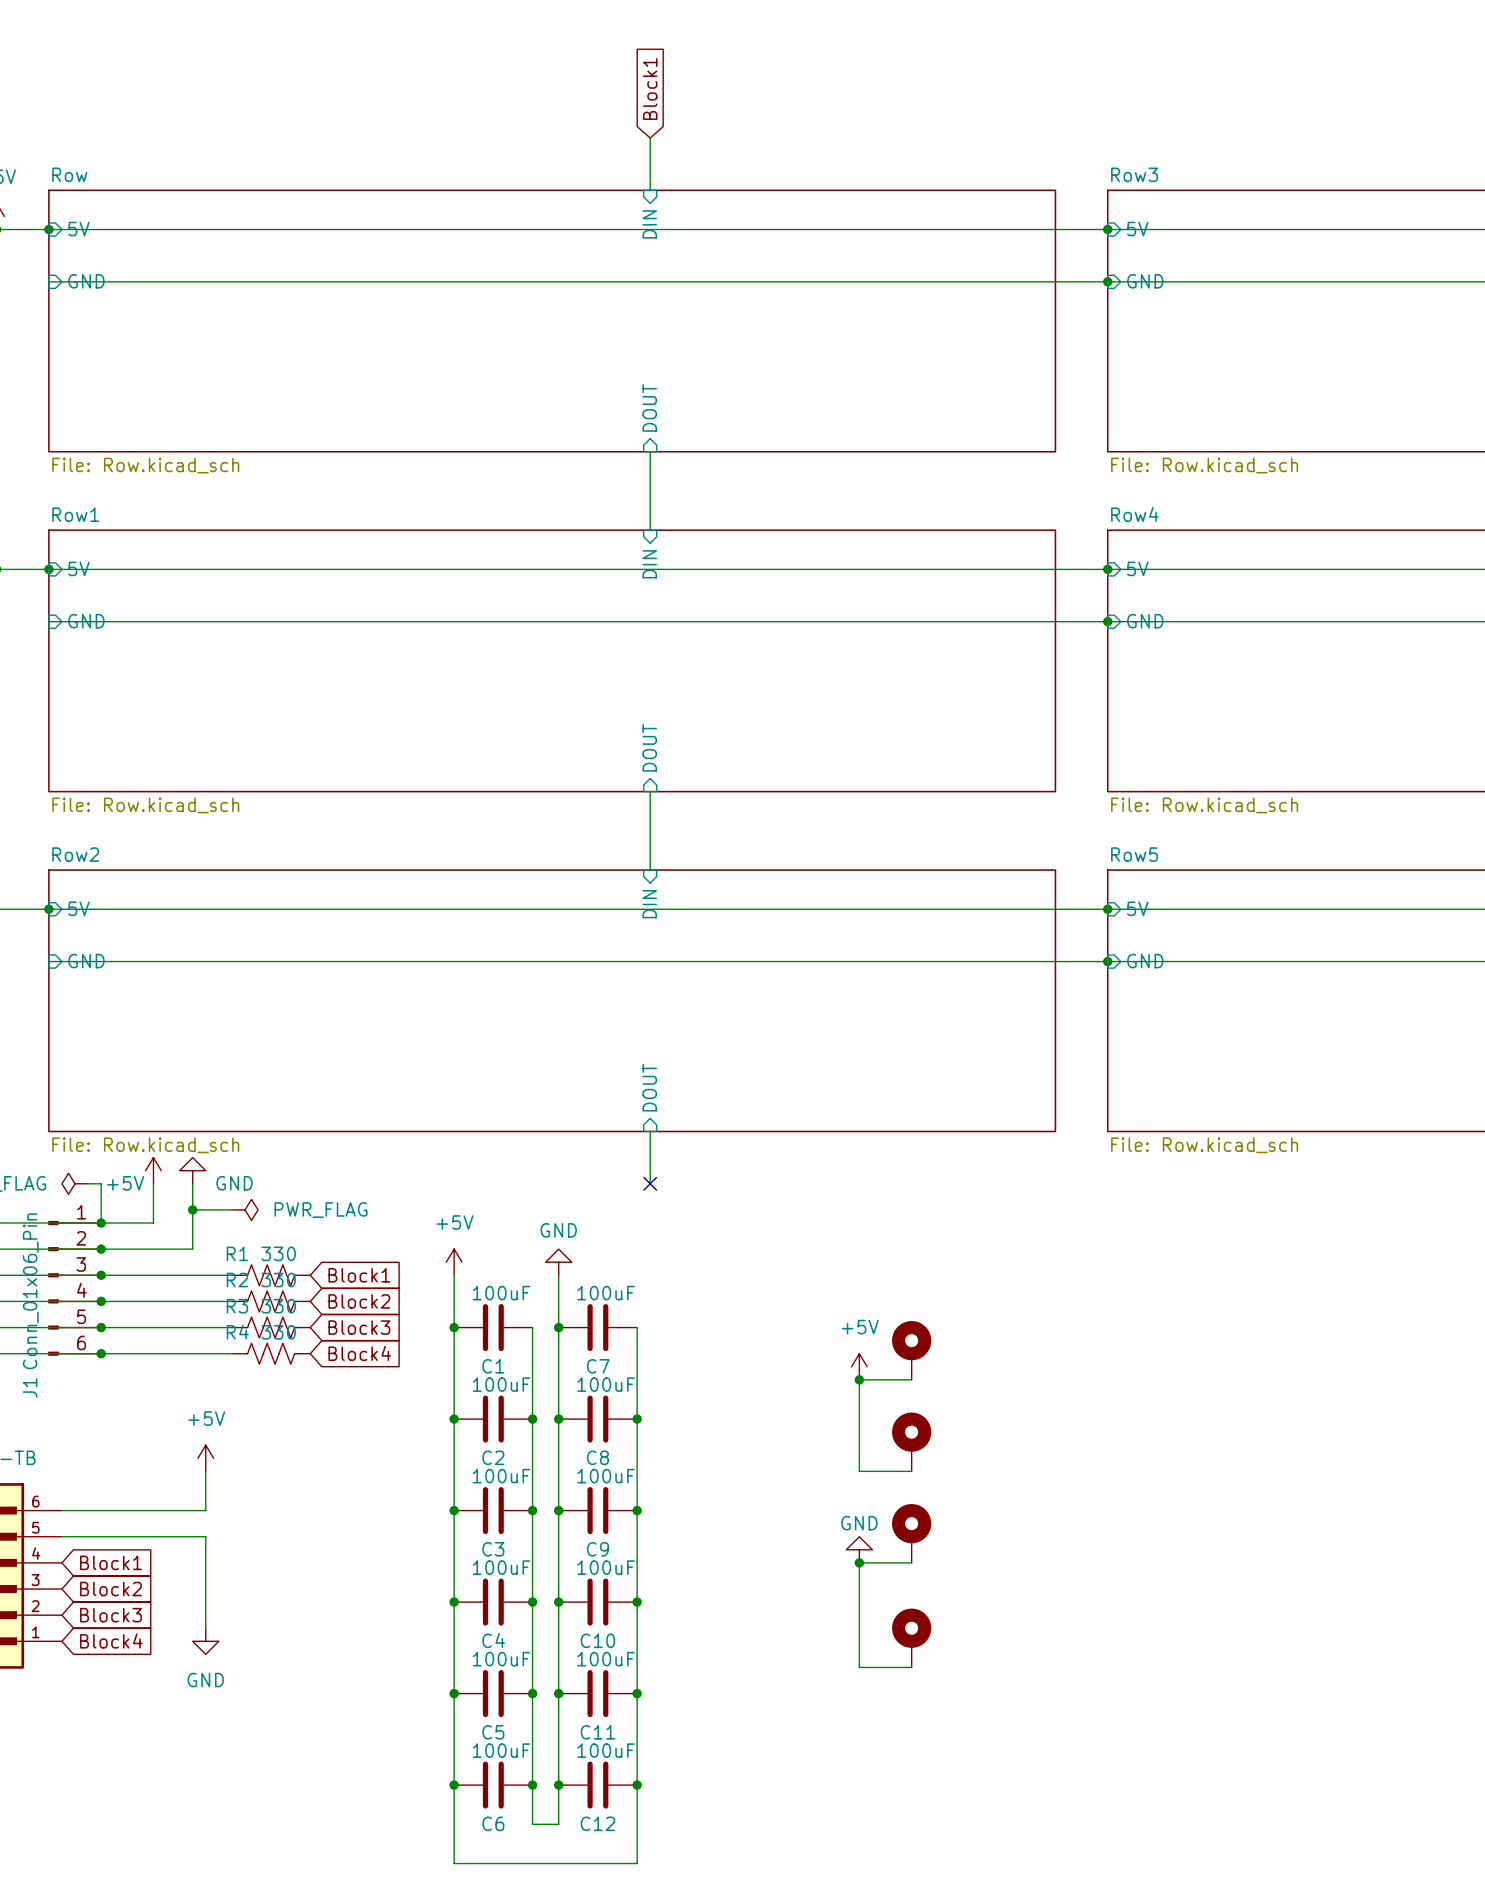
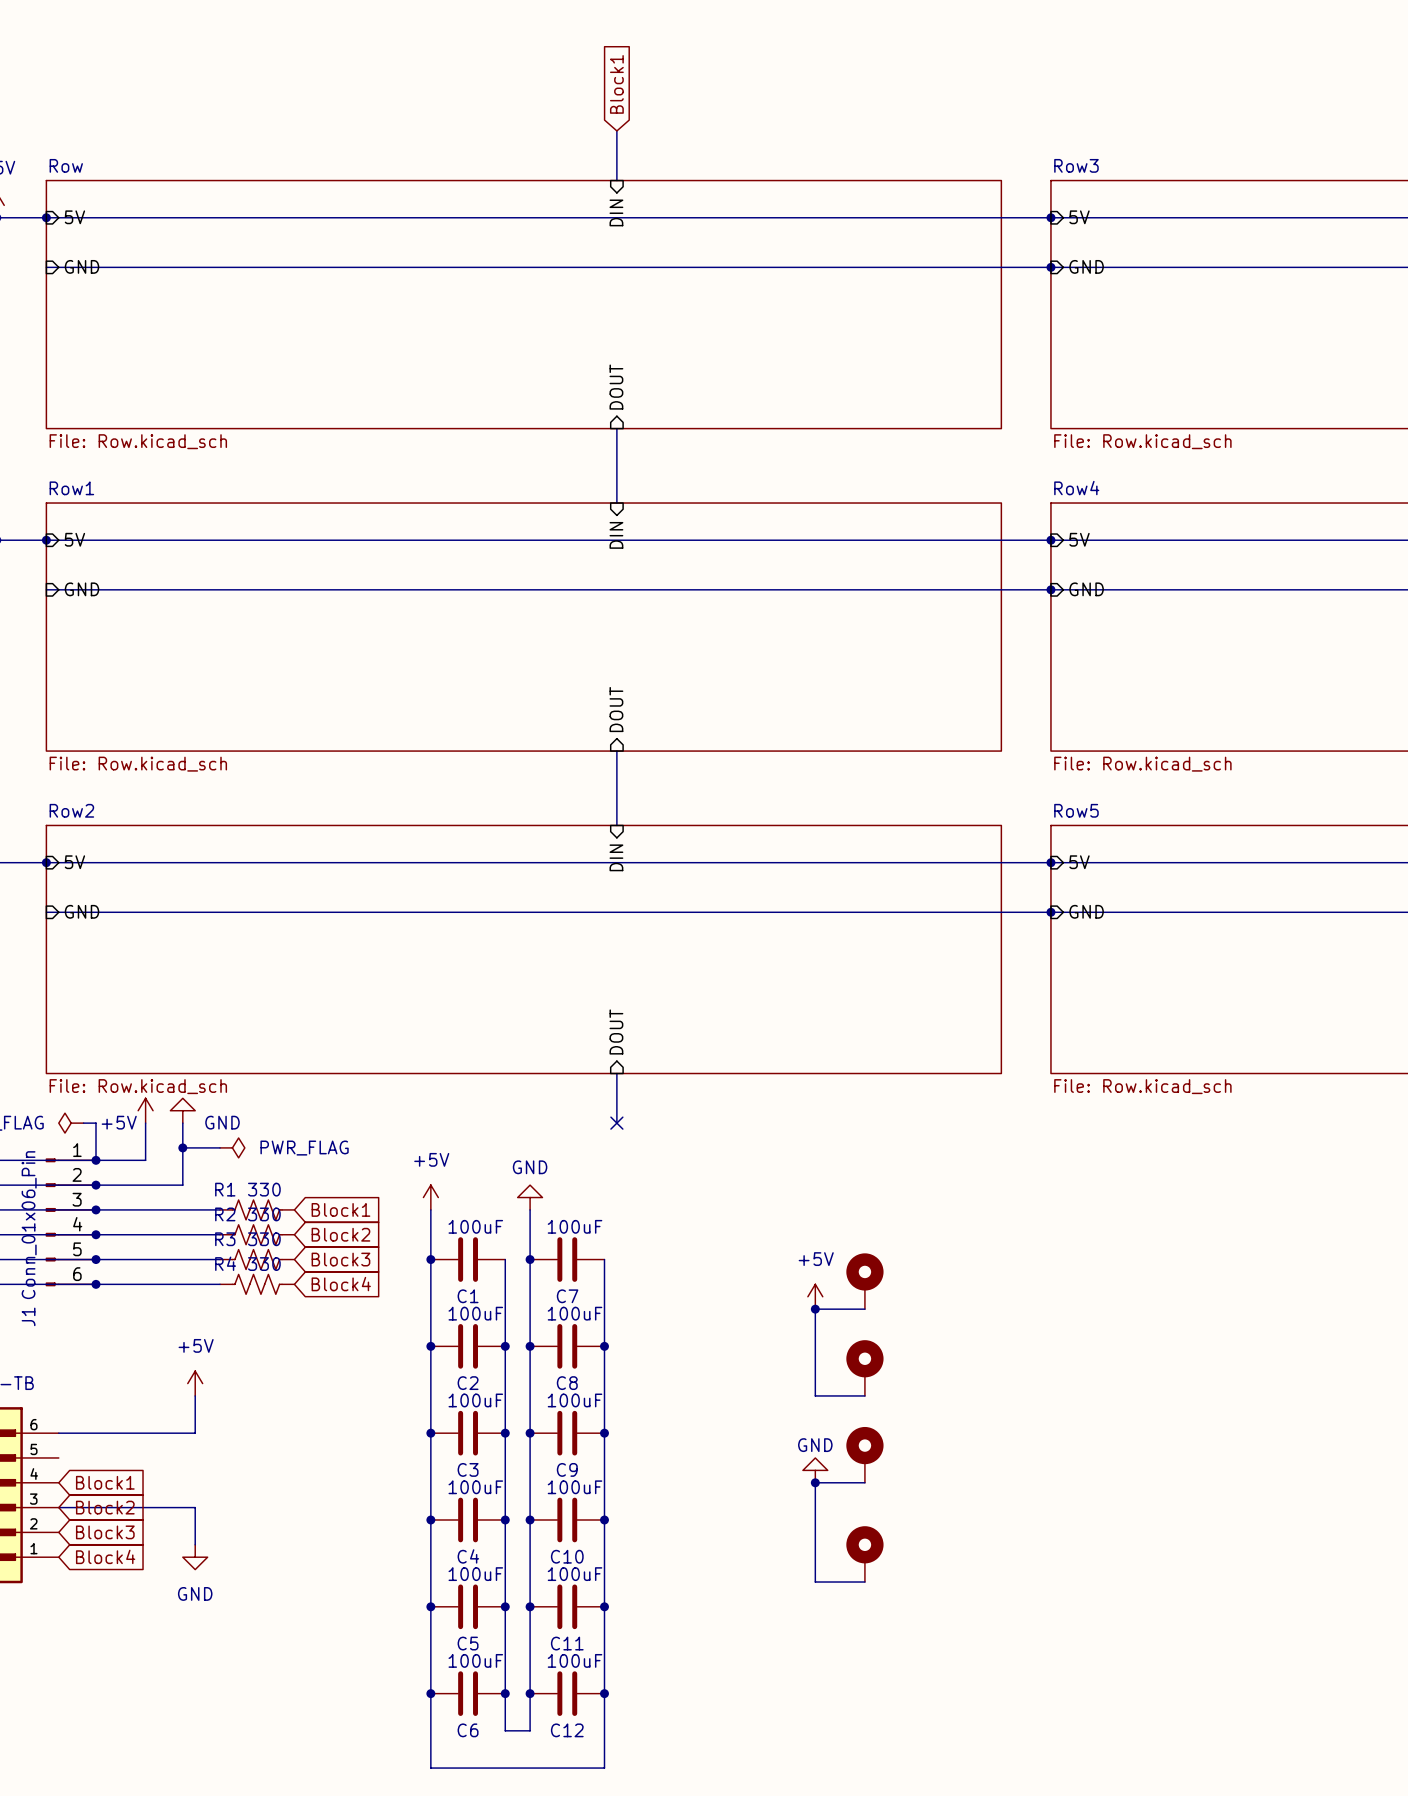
wire: (61, 1536) (205, 1536) (205, 1589) -> (58, 1507) (195, 1507)

